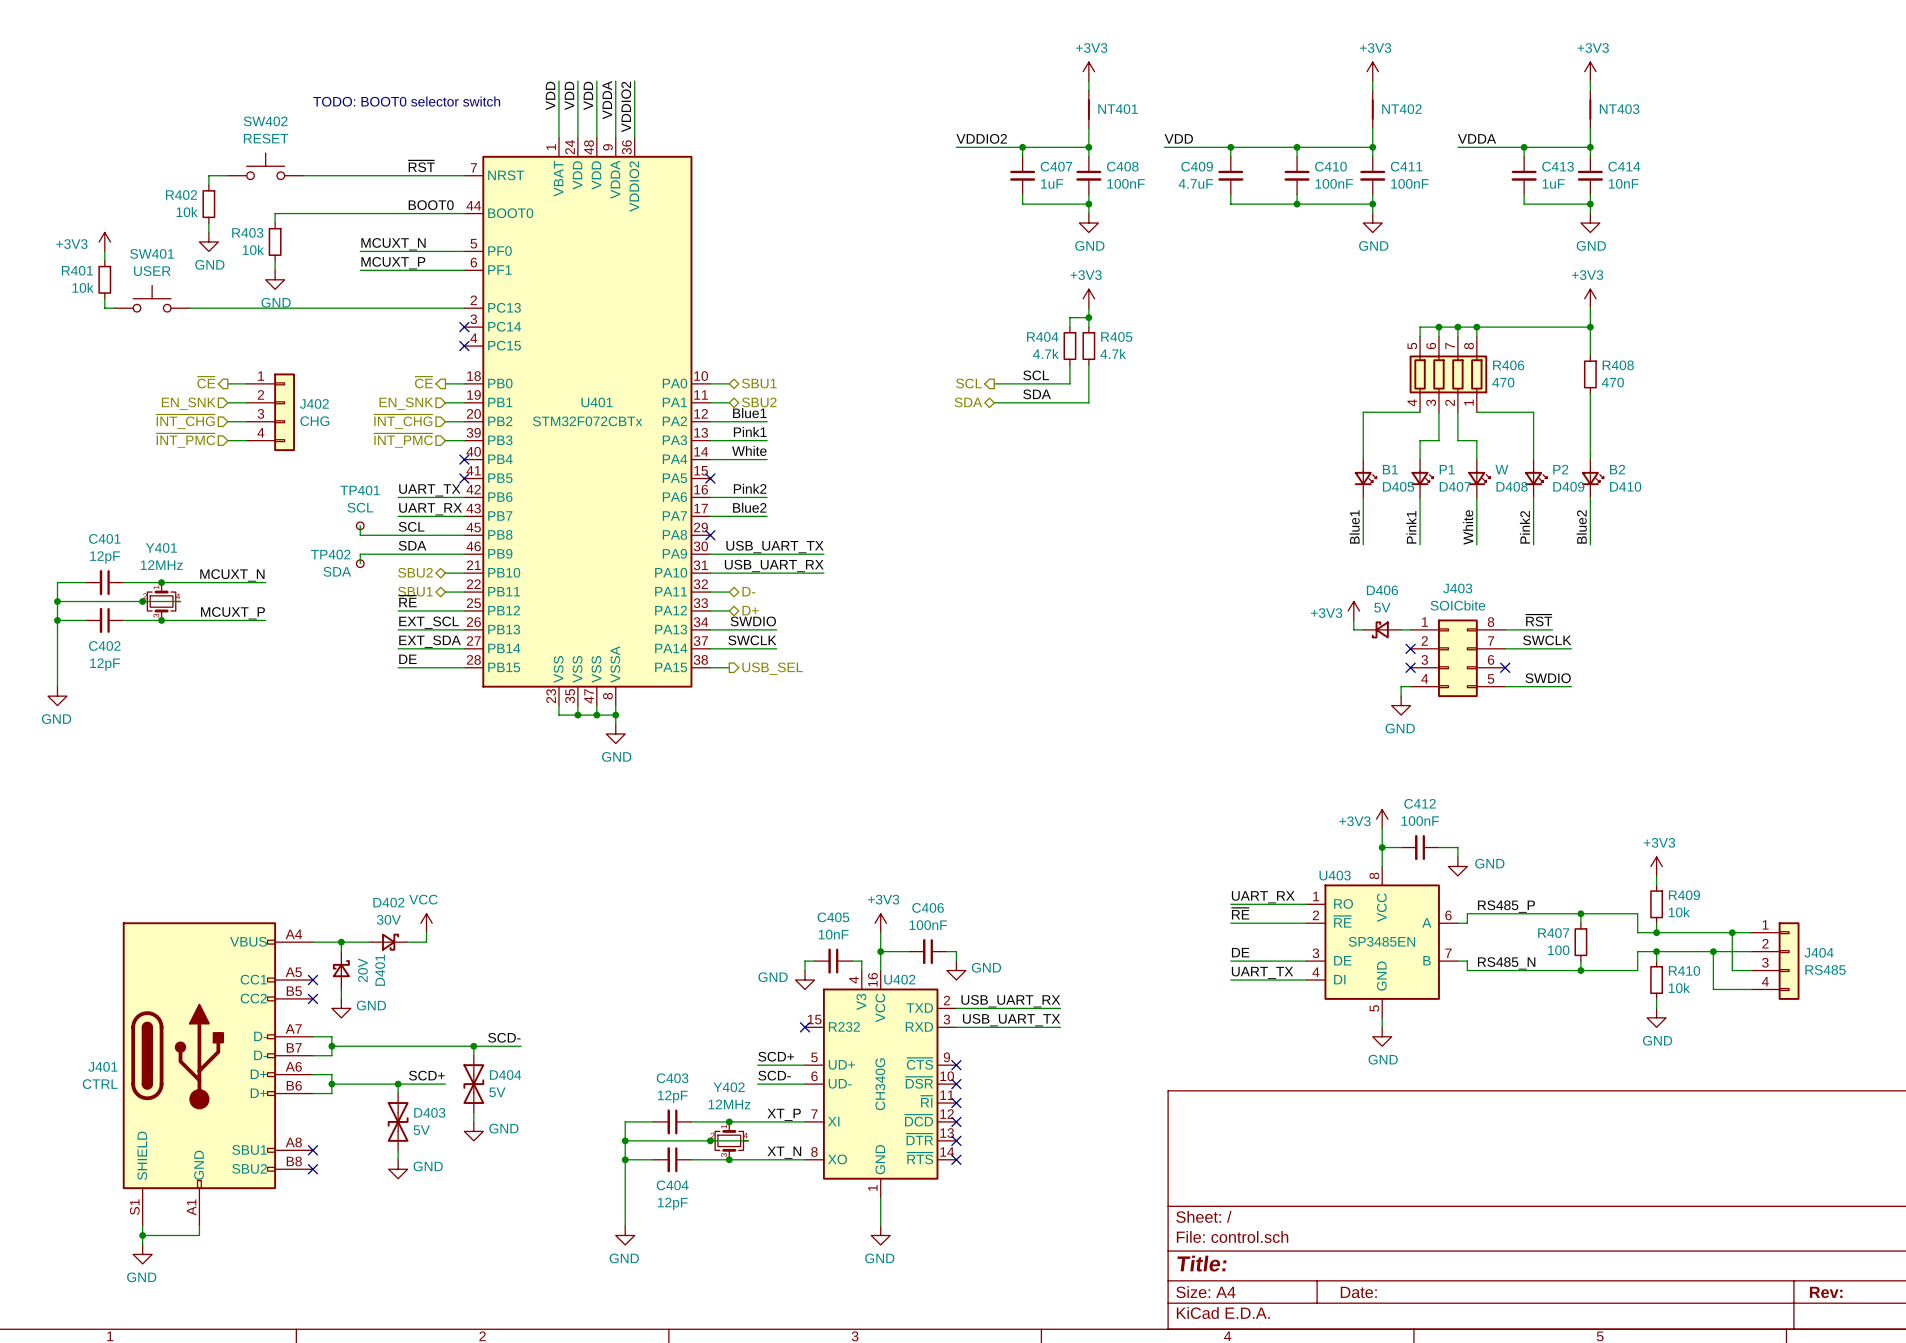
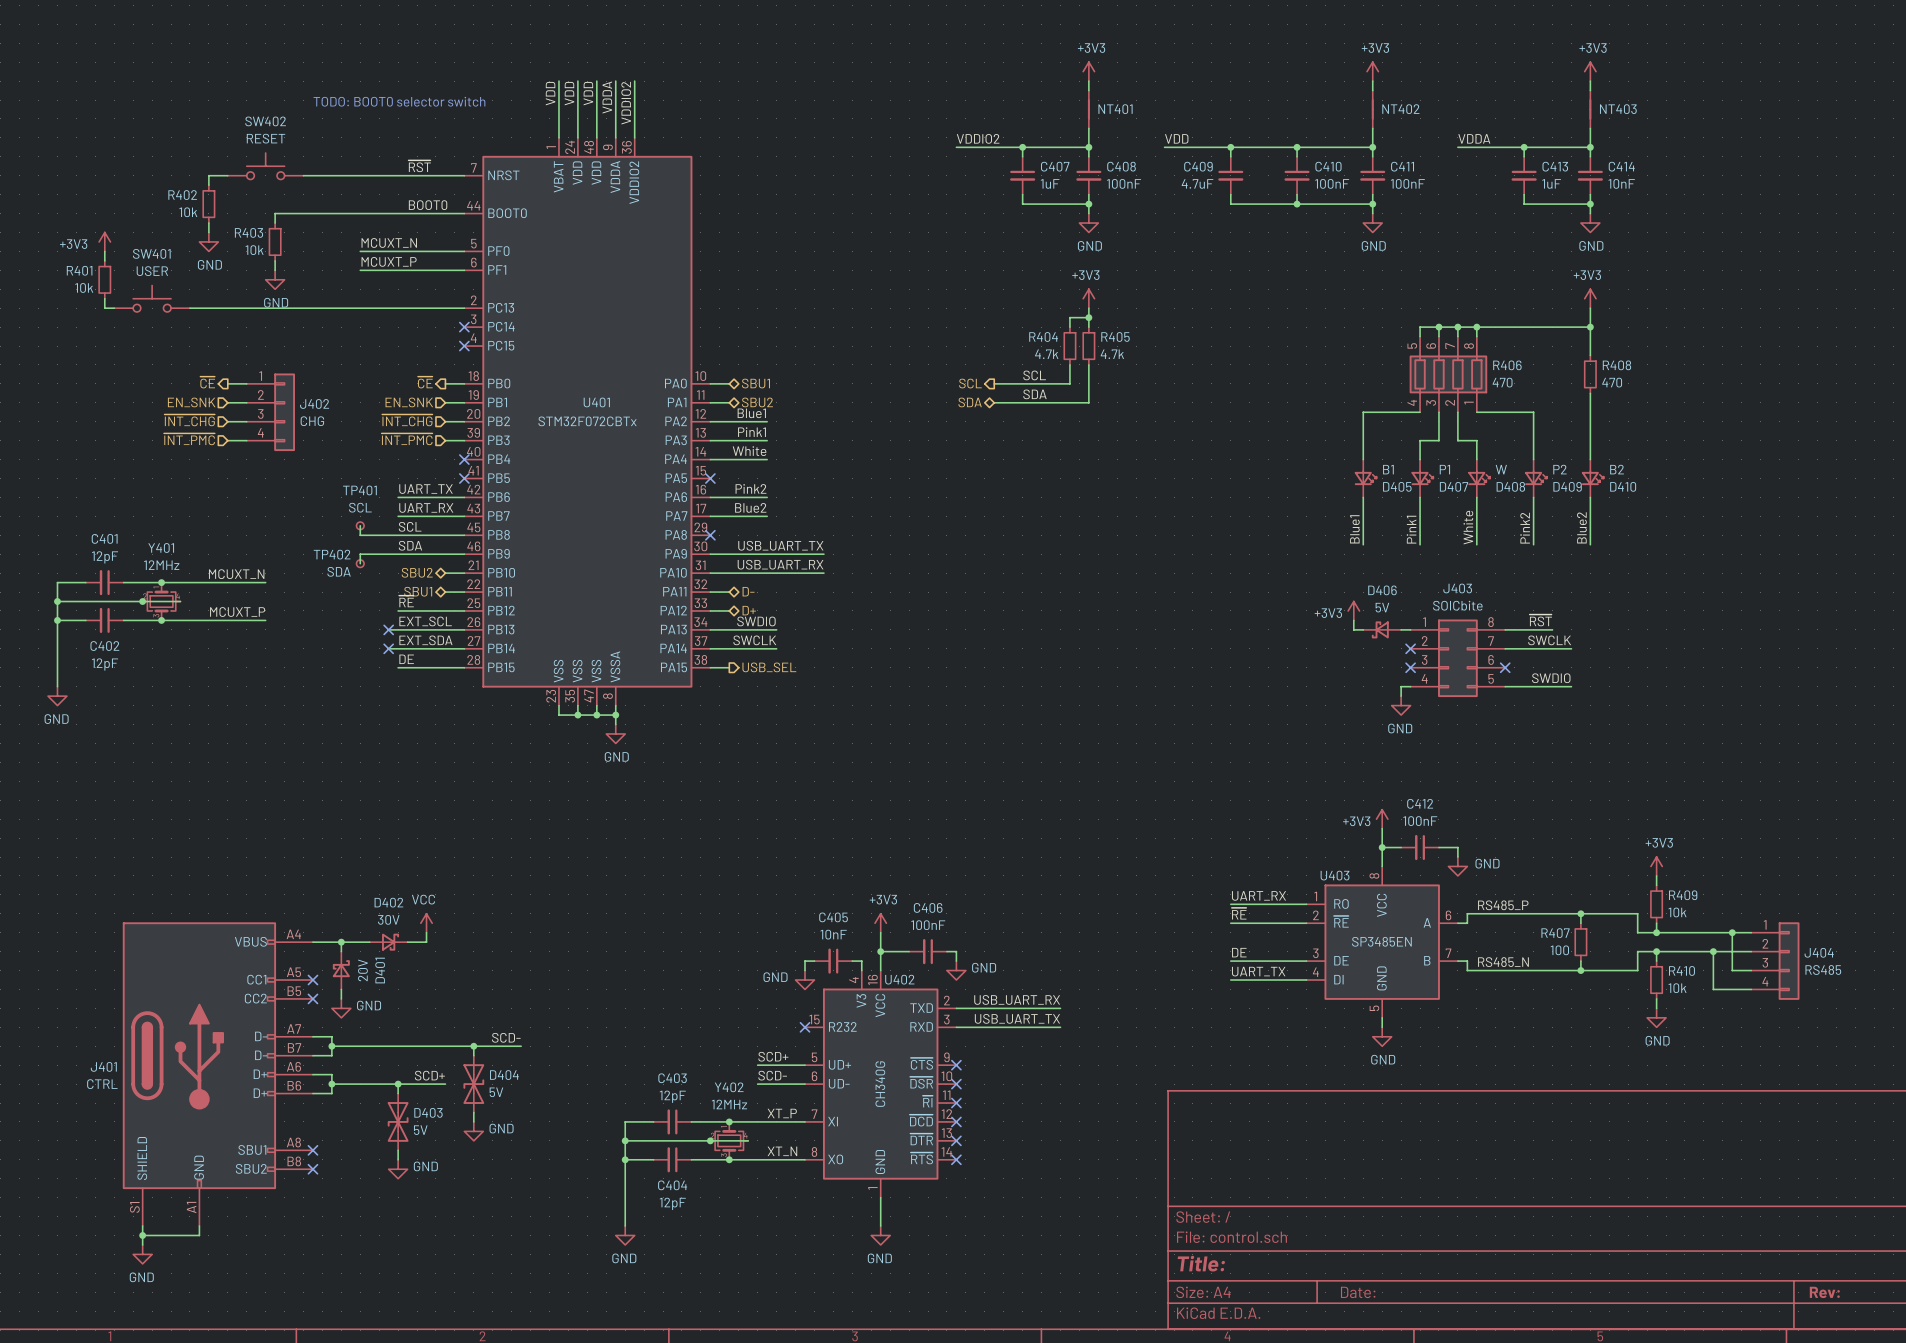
wire: none -> (388, 629) (398, 629)
no-connect mark: none -> (388, 629)
wire: none -> (388, 648) (398, 648)
no-connect mark: none -> (388, 648)

